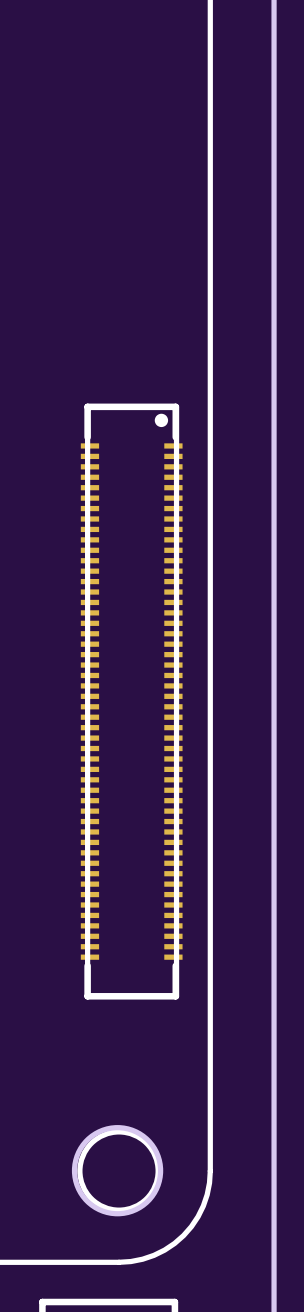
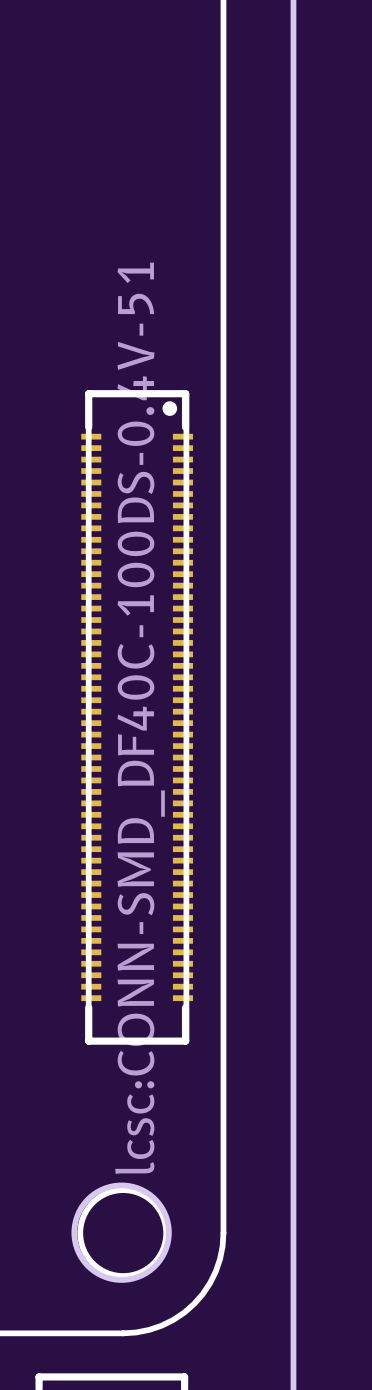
part text: none -> lcsc:CONN-SMD_DF40C-100DS-0.4V-51 (140, 718)

